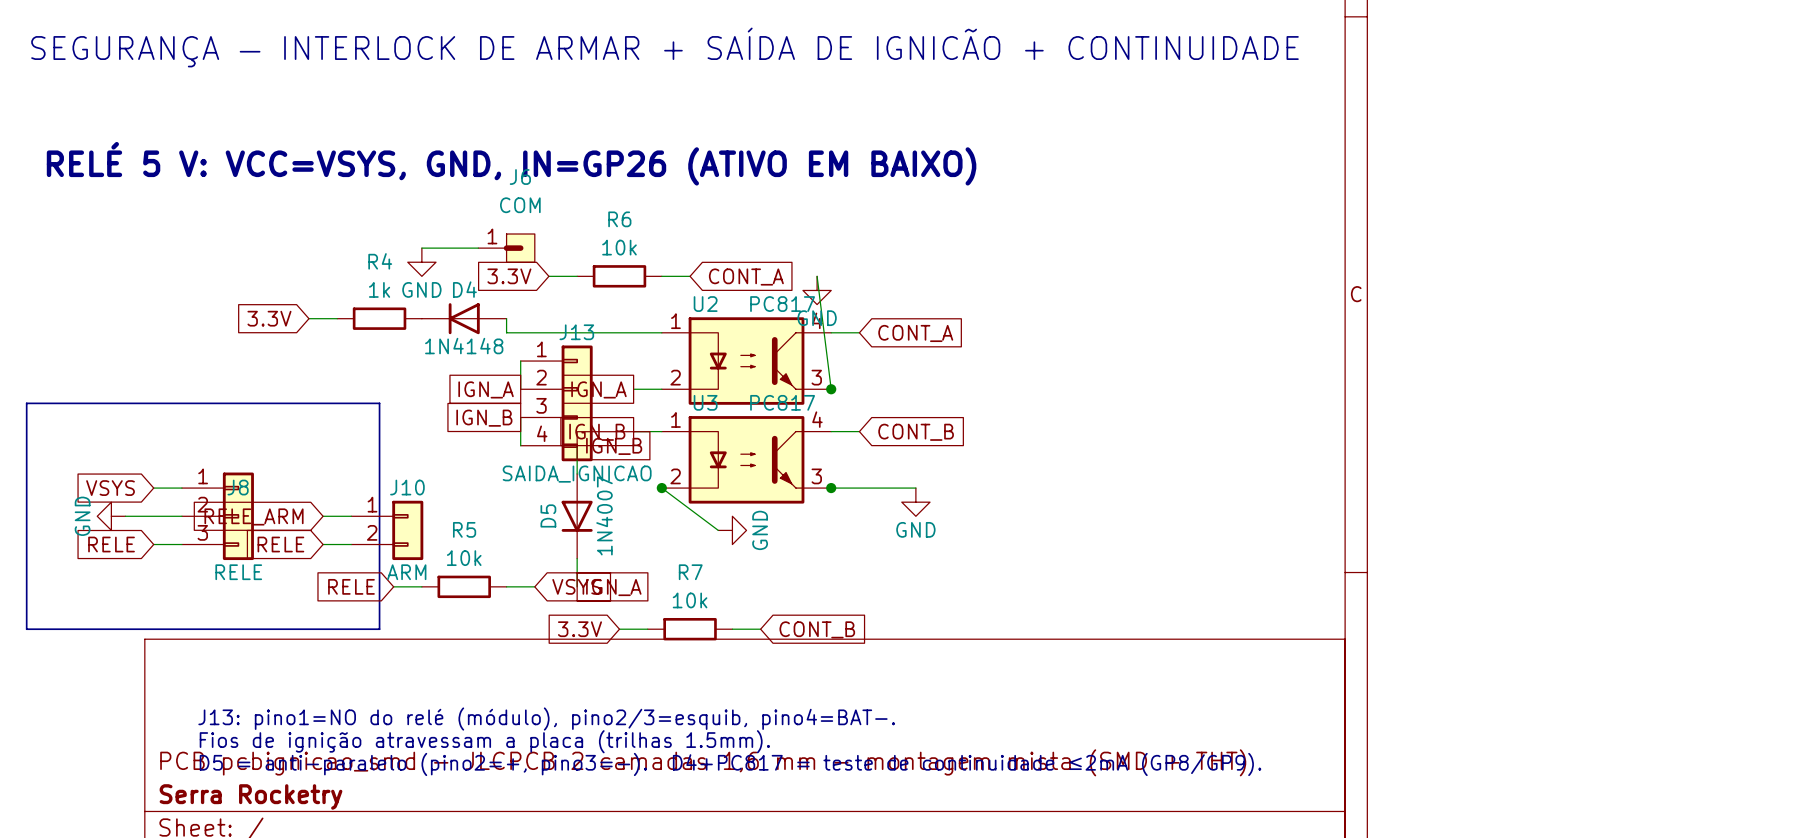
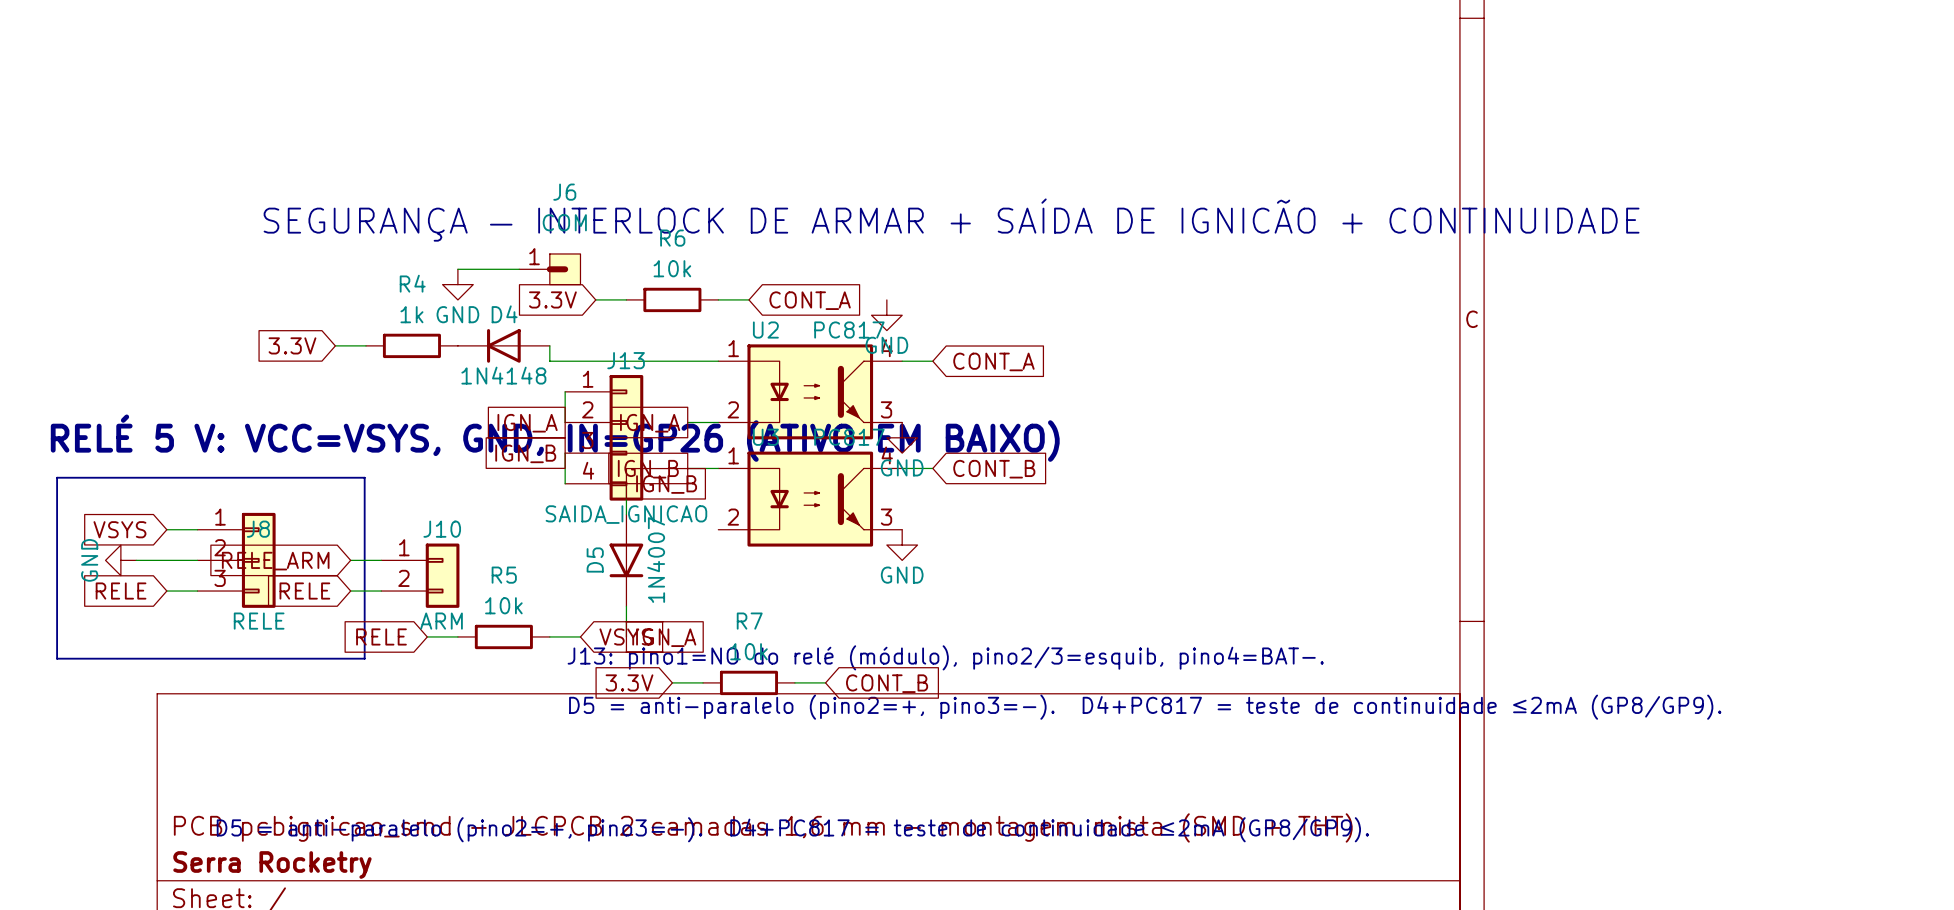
text position: SEGURANÇA — INTERLOCK DE ARMAR + SAÍDA DE IGNICÃO + CONTINUIDADE (664, 47) -> SEGURANÇA — INTERLOCK DE ARMAR + SAÍDA DE IGNICÃO + CONTINUIDADE (951, 220)
text position: RELÉ 5 V: VCC=VSYS, GND, IN=GP26 (ATIVO EM BAIXO) (511, 163) -> RELÉ 5 V: VCC=VSYS, GND, IN=GP26 (ATIVO EM BAIXO) (555, 438)
wire: (817, 276) (831, 389) -> none
junction: (831, 389) -> none
line: (26, 403) (379, 403) (379, 629) (26, 629) (26, 403) -> (57, 477) (57, 658) (364, 658) (364, 477) (57, 477)
power symbol: none -> GND (902, 437)
wire: (661, 488) (718, 530) -> none
junction: (661, 488) -> none
wire: (831, 488) (915, 488) -> none
junction: (831, 488) -> none
power symbol: none -> GND (902, 545)
power symbol: GND (915, 502) -> none
power symbol: GND (732, 530) -> none
text: none -> J13: pino1=NO do relé (módulo), pino2/3=esquib, pino4=BAT-. (945, 657)
text: none -> D5 = anti-paralelo (pino2=+, pino3=-). D4+PC817 = teste de continuidade ≤2mA (GP8/GP9). (1145, 707)
text: J13: pino1=NO do relé (módulo), pino2/3=esquib, pino4=BAT-. (546, 719) -> none
text: Fios de ignição atravessam a placa (trilhas 1.5mm). (484, 741) -> none

